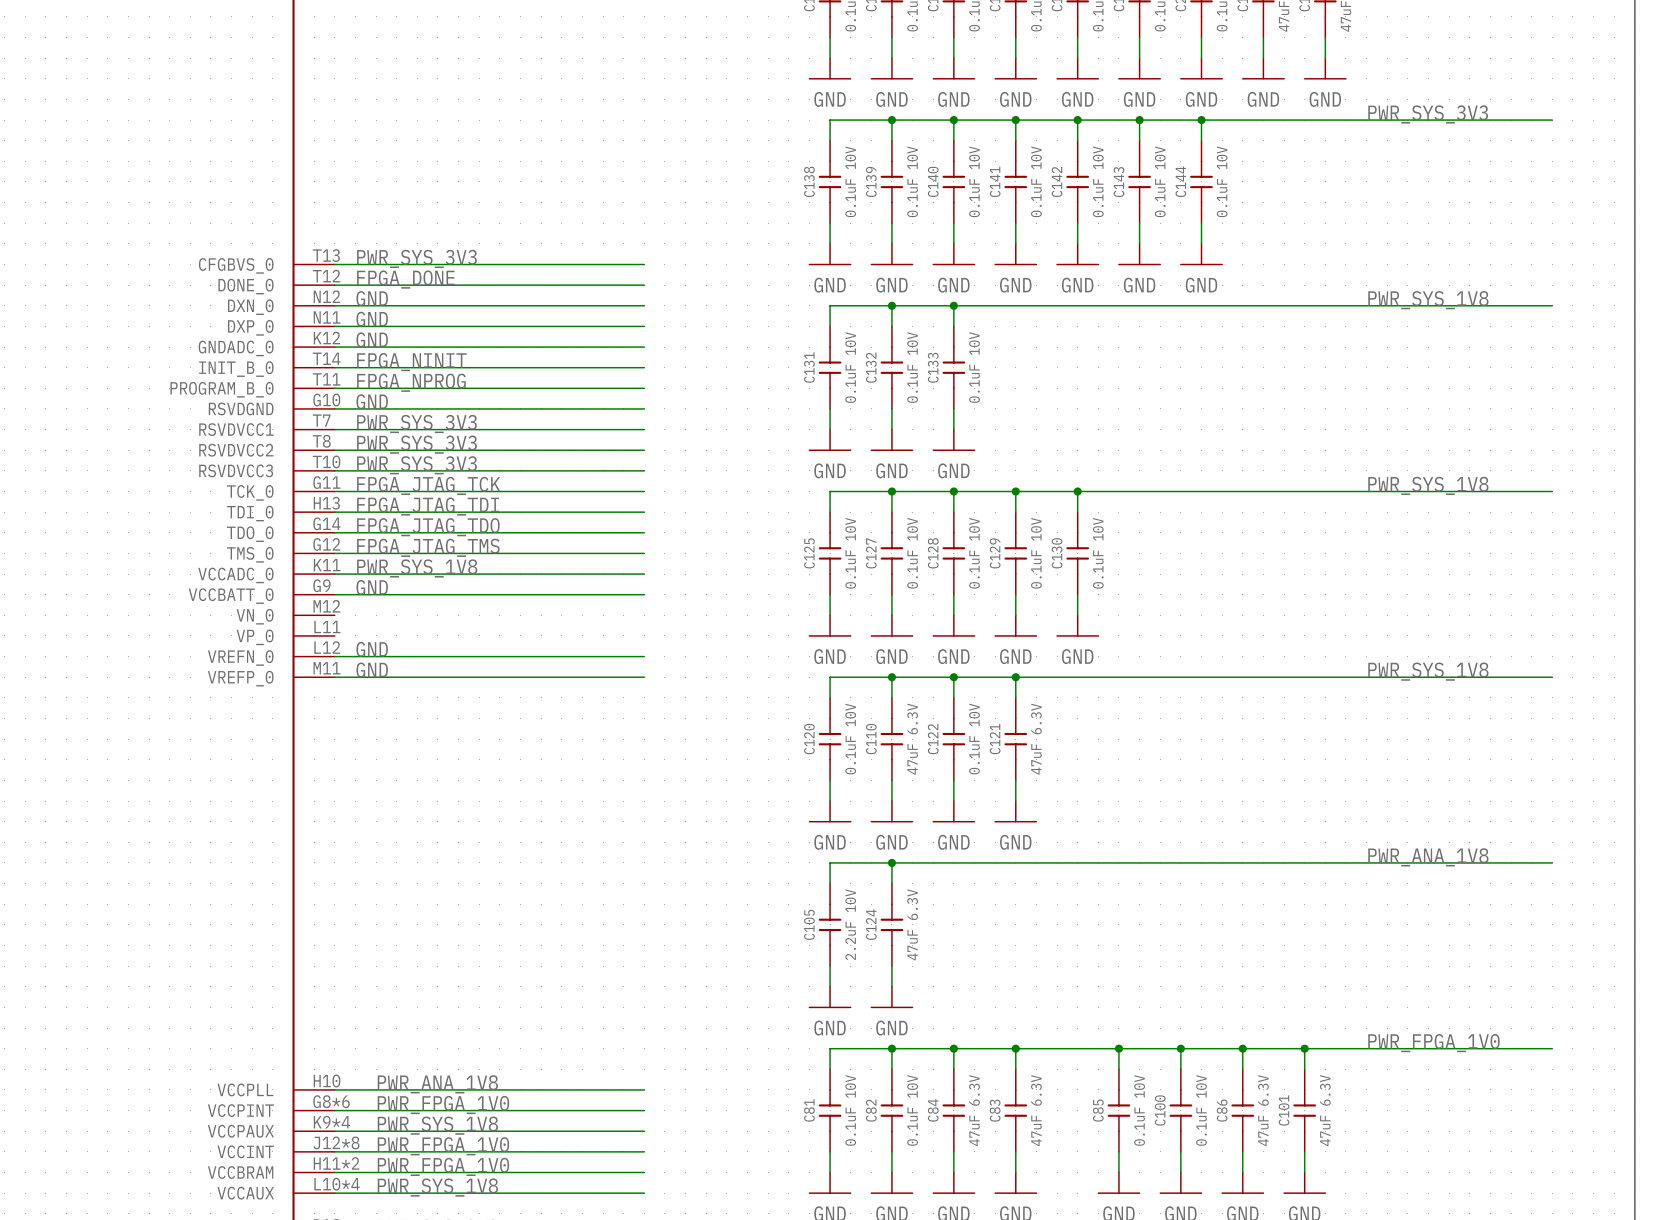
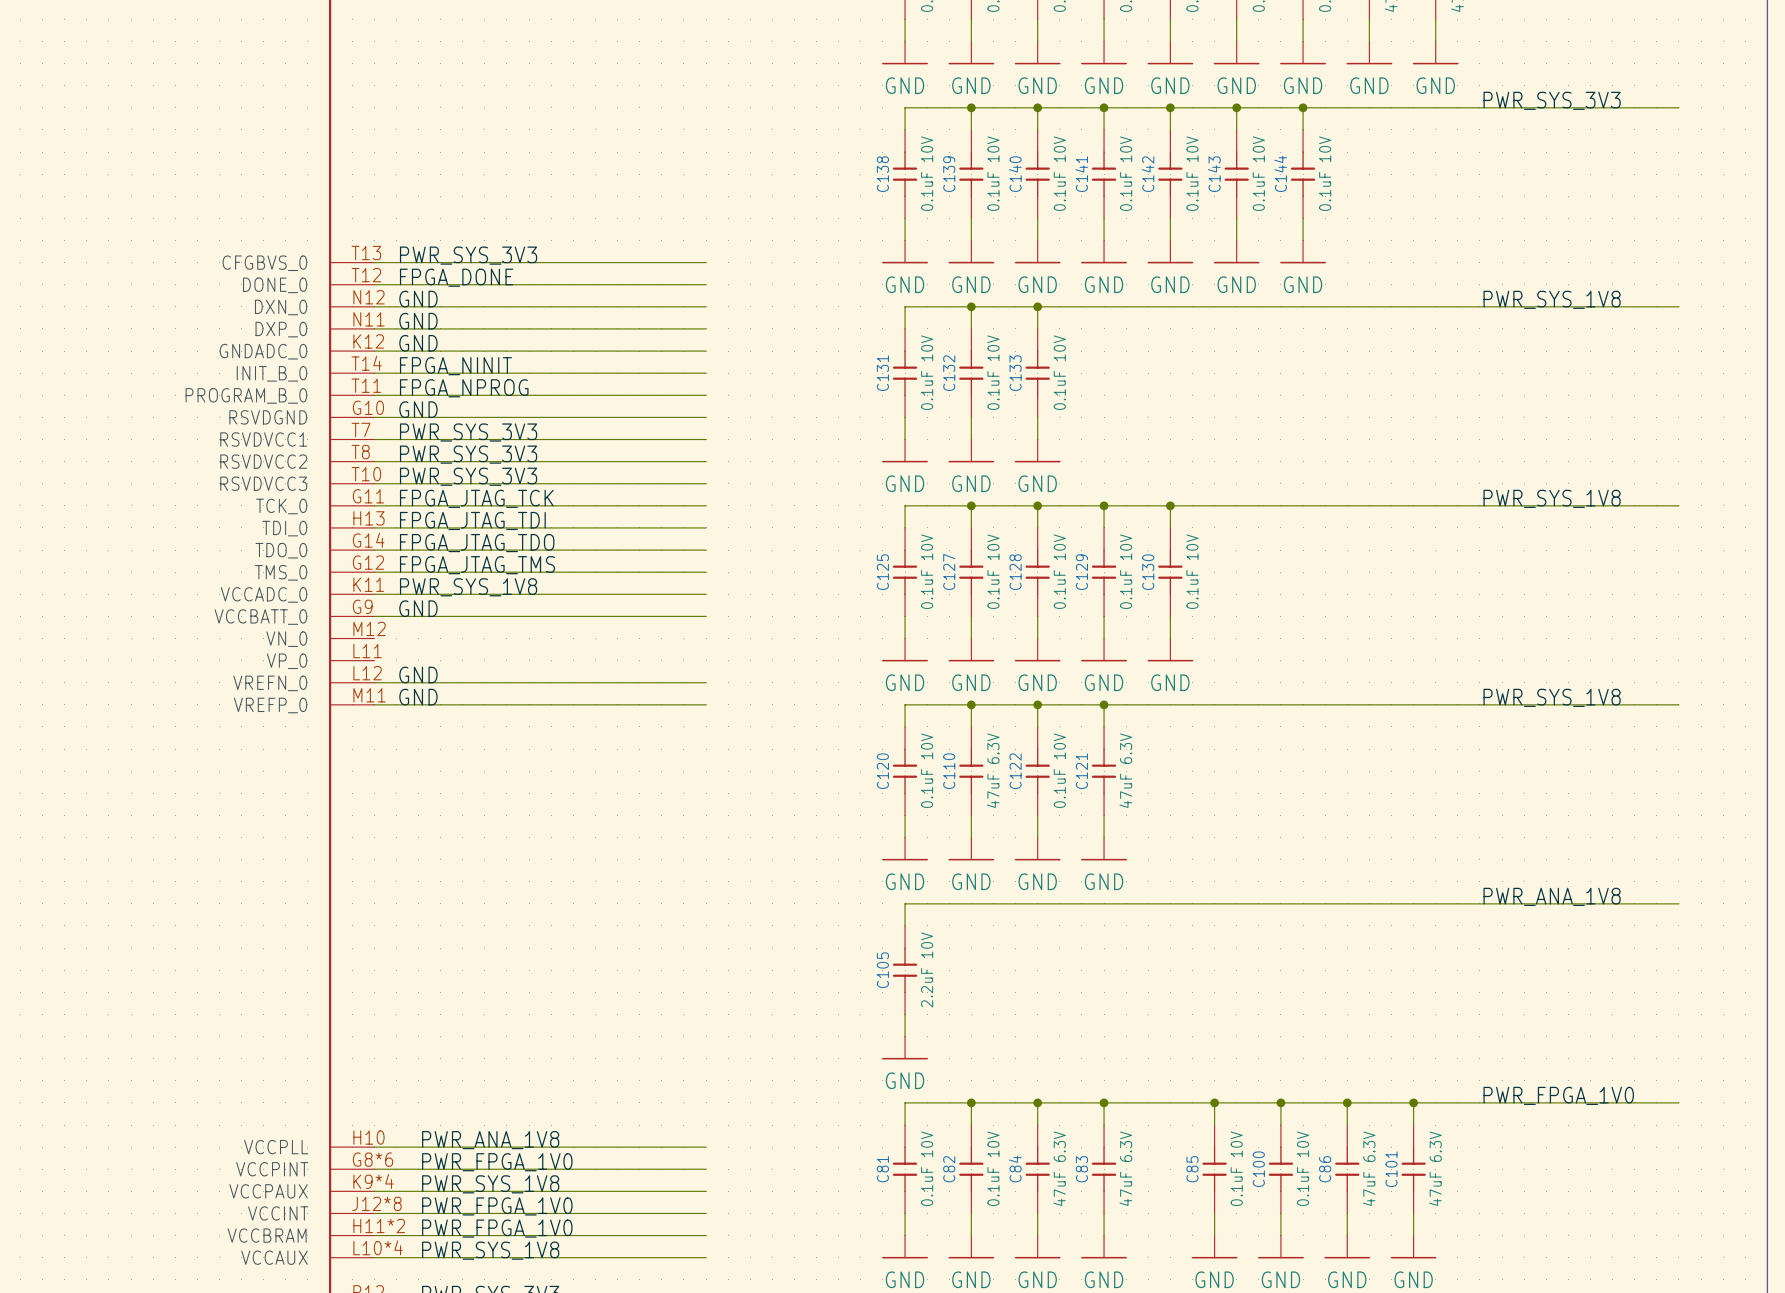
wire: (891, 862) (891, 883) -> none
junction: (891, 862) -> none
C124: 47uF 6.3V (891, 924) -> none
wire: (891, 966) (891, 986) -> none
power symbol: GND (891, 997) -> none

